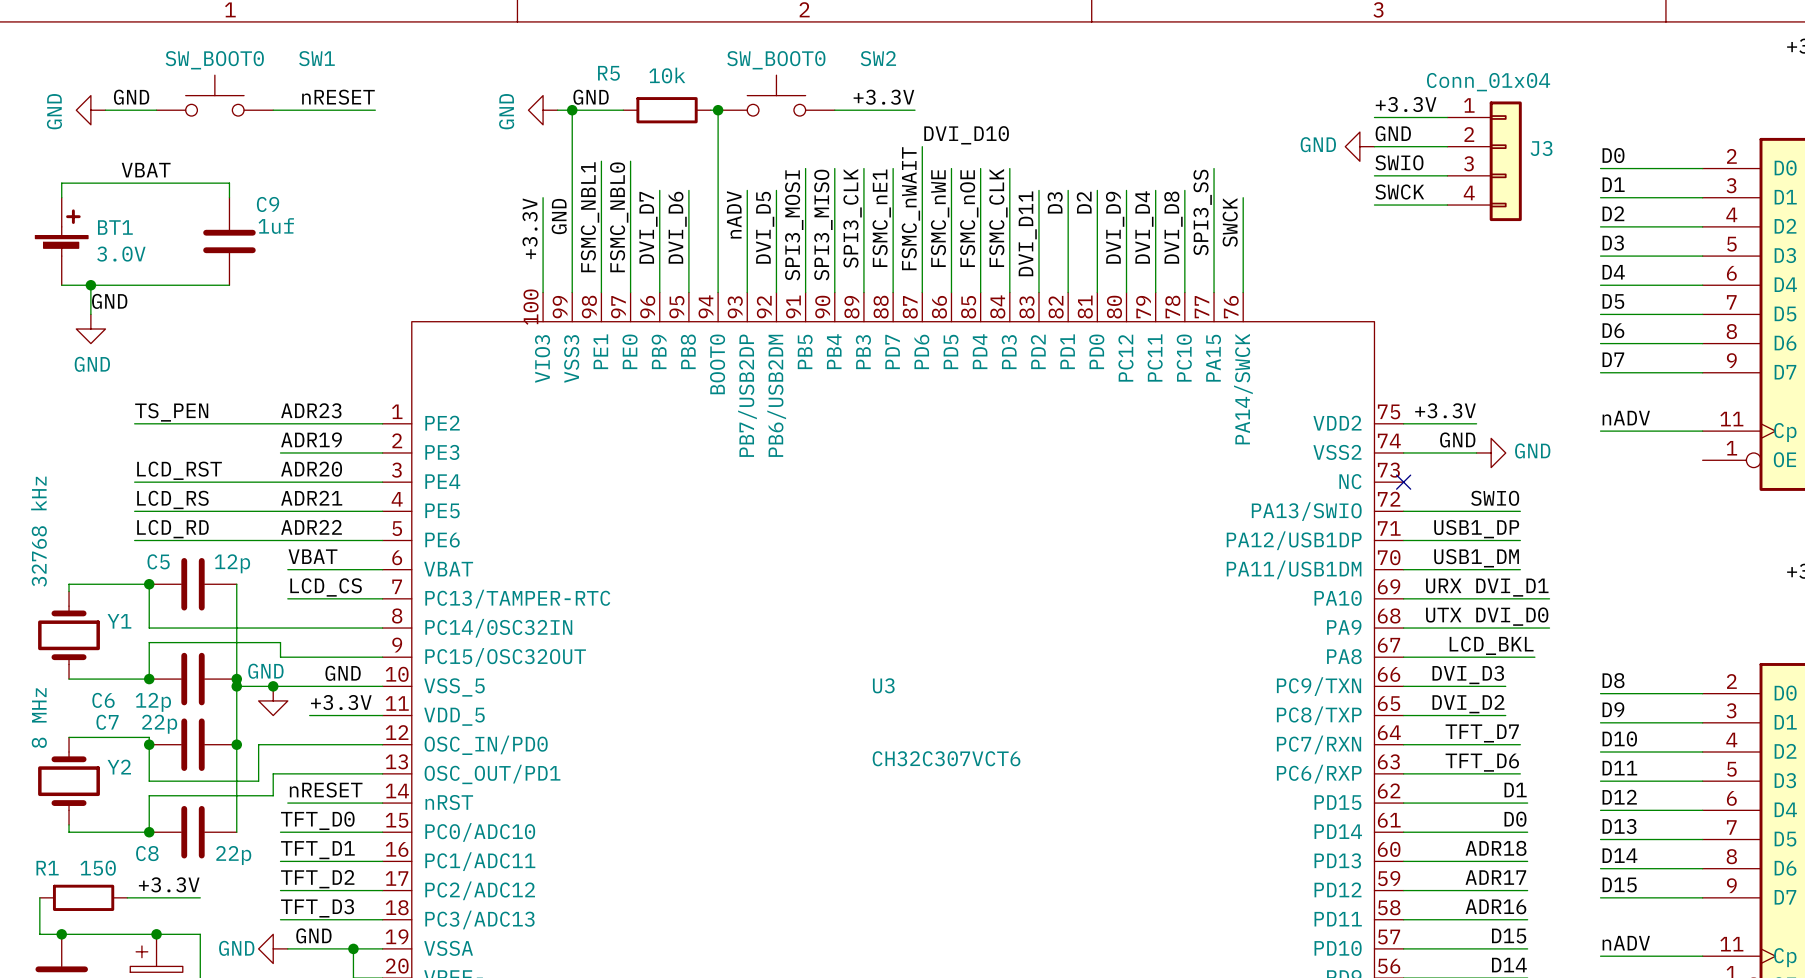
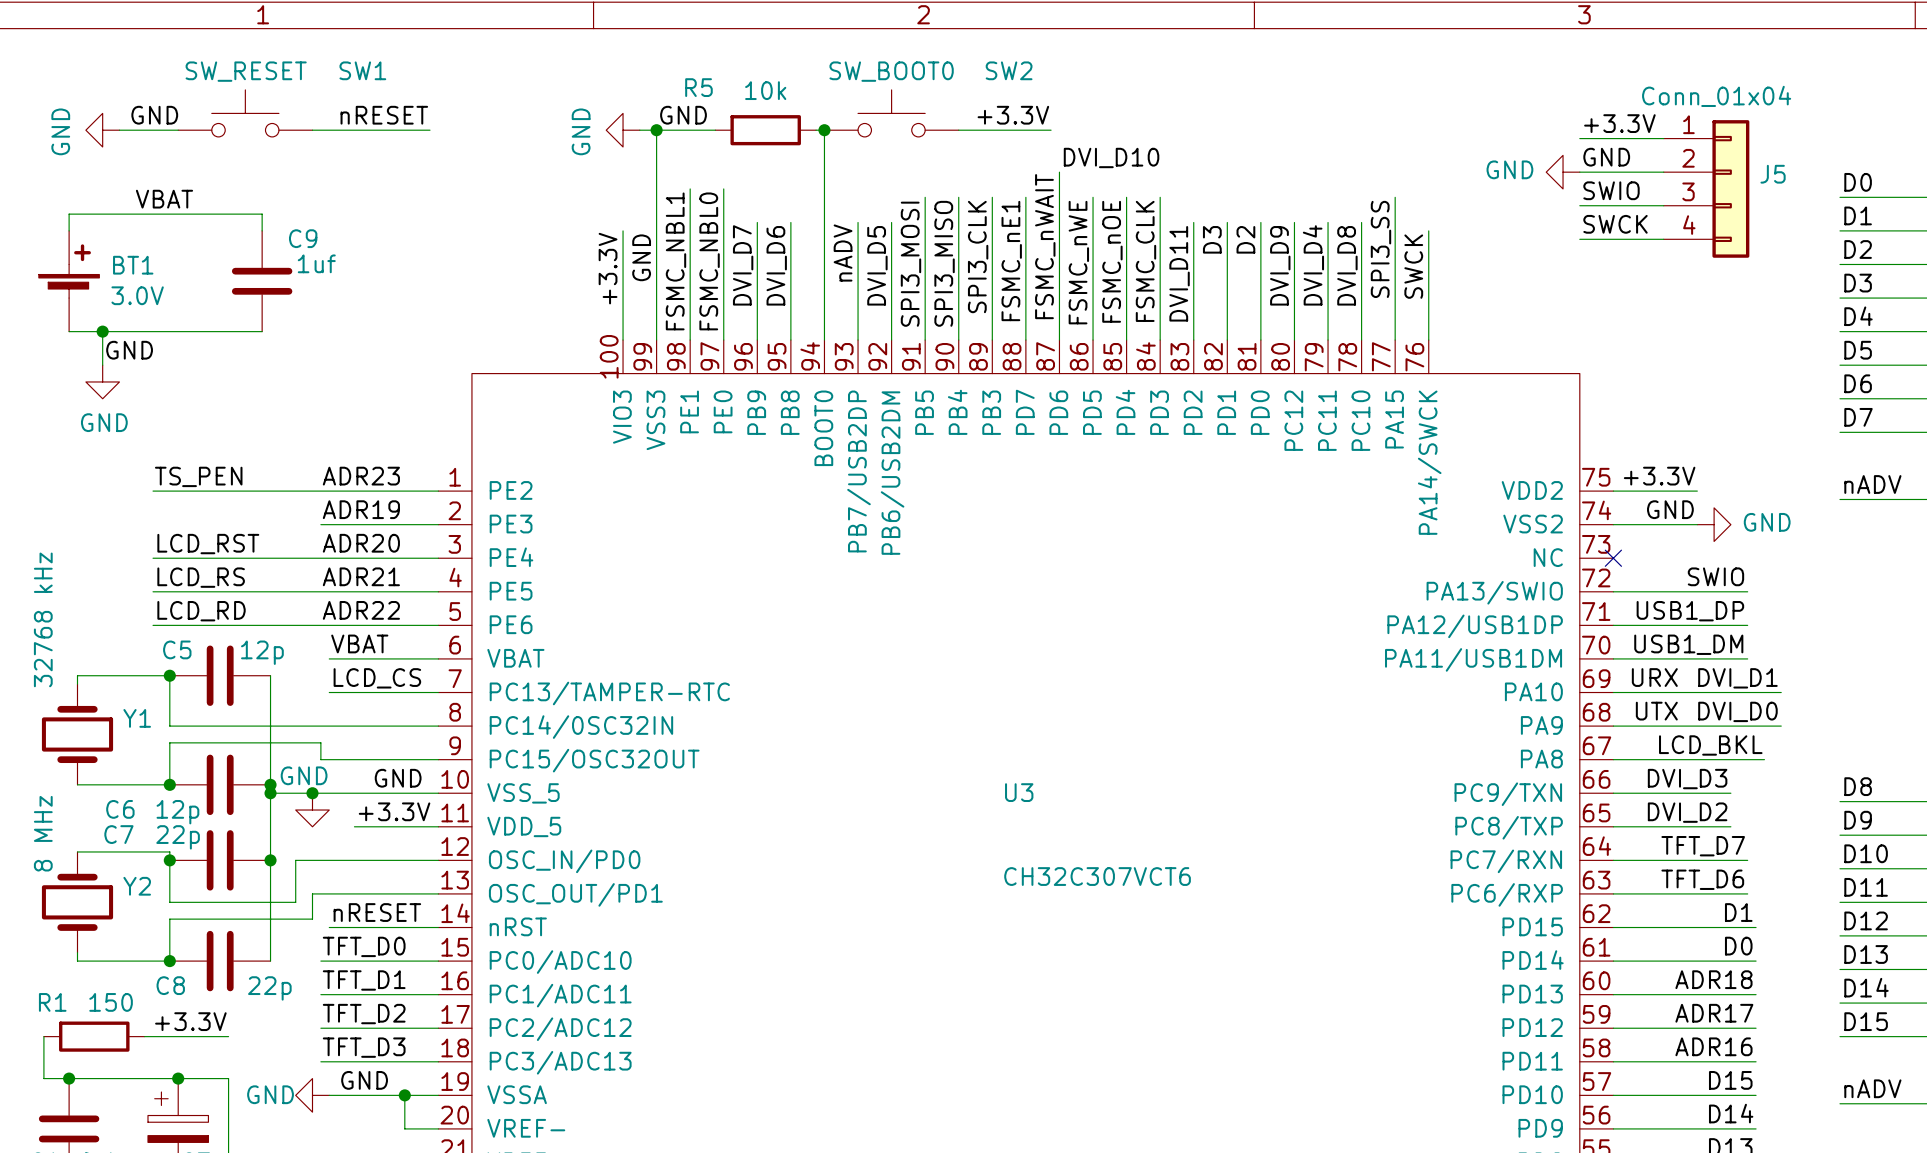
SW1 value: SW_BOOT0 (214, 60) -> SW_RESET (246, 71)
J3 name: J3 (1541, 148) -> J5 (1773, 174)

